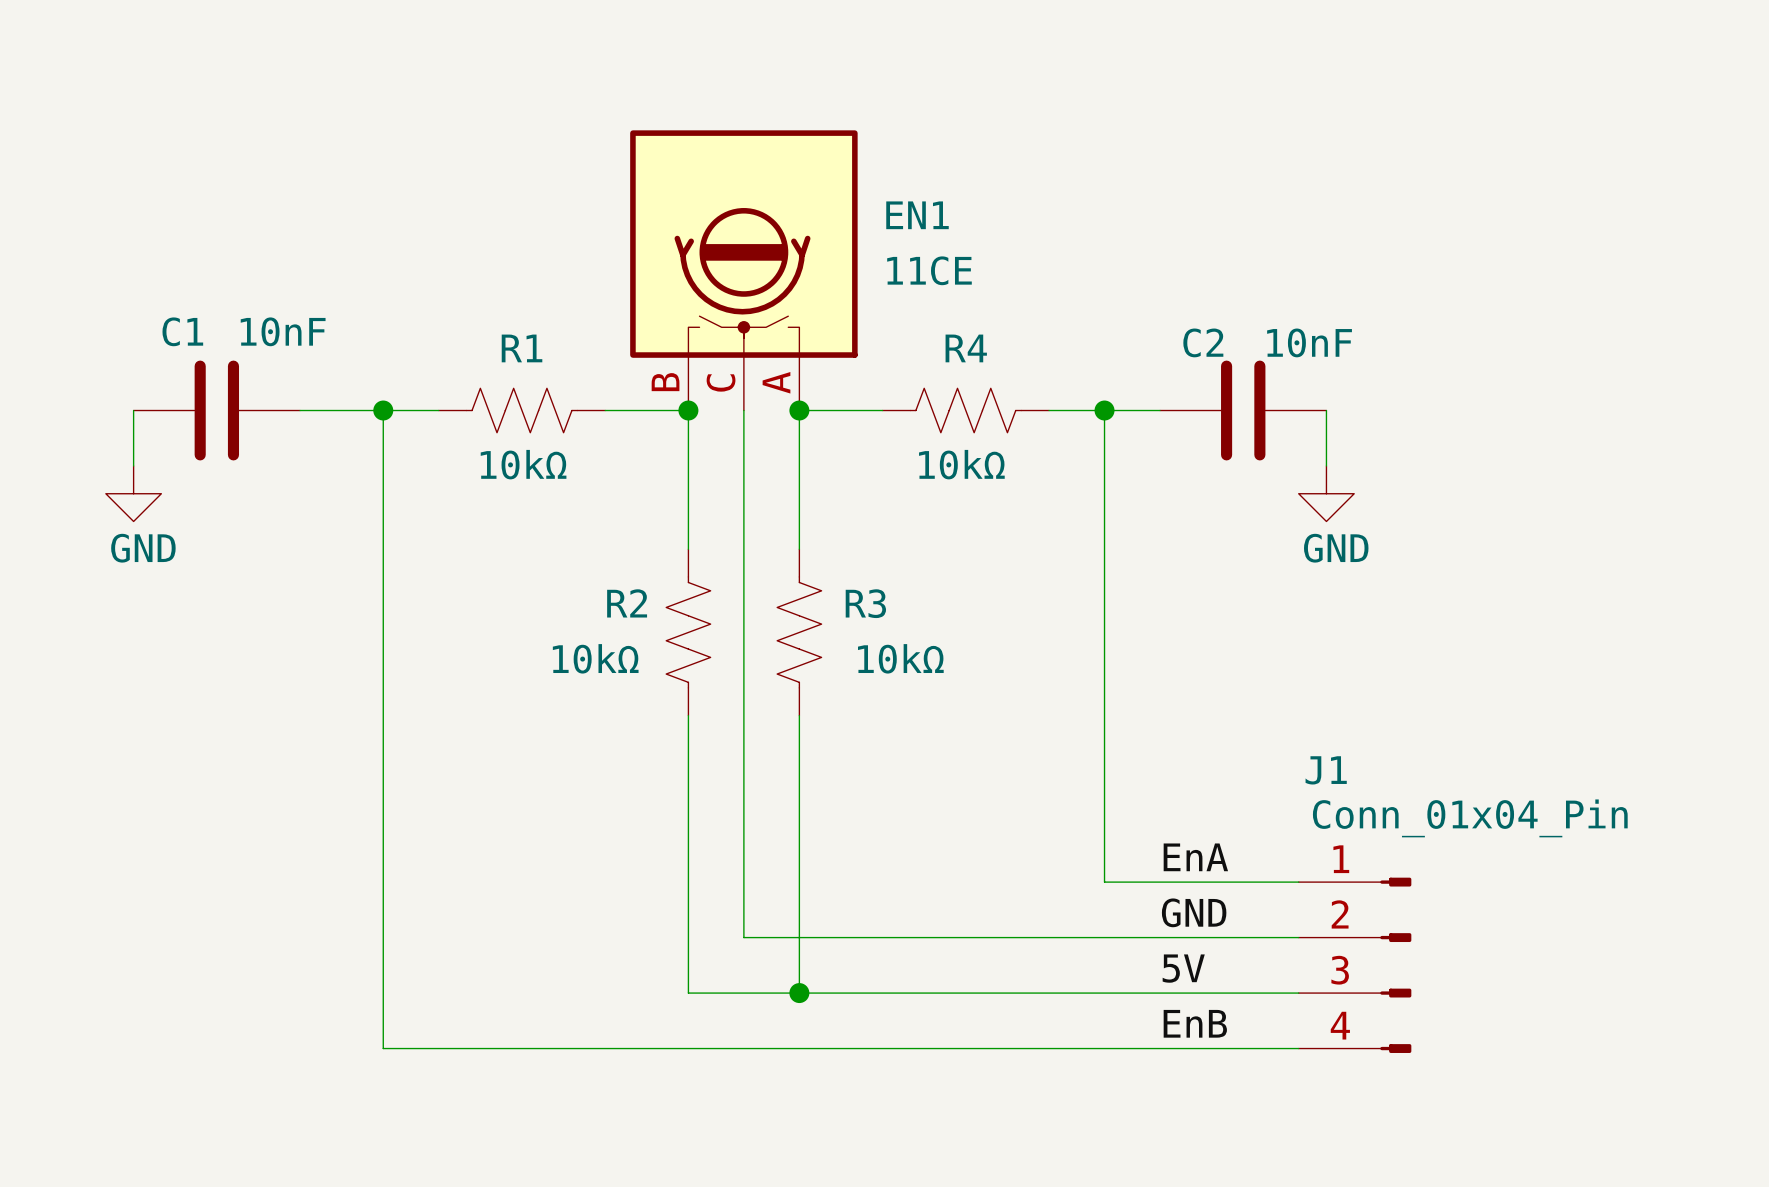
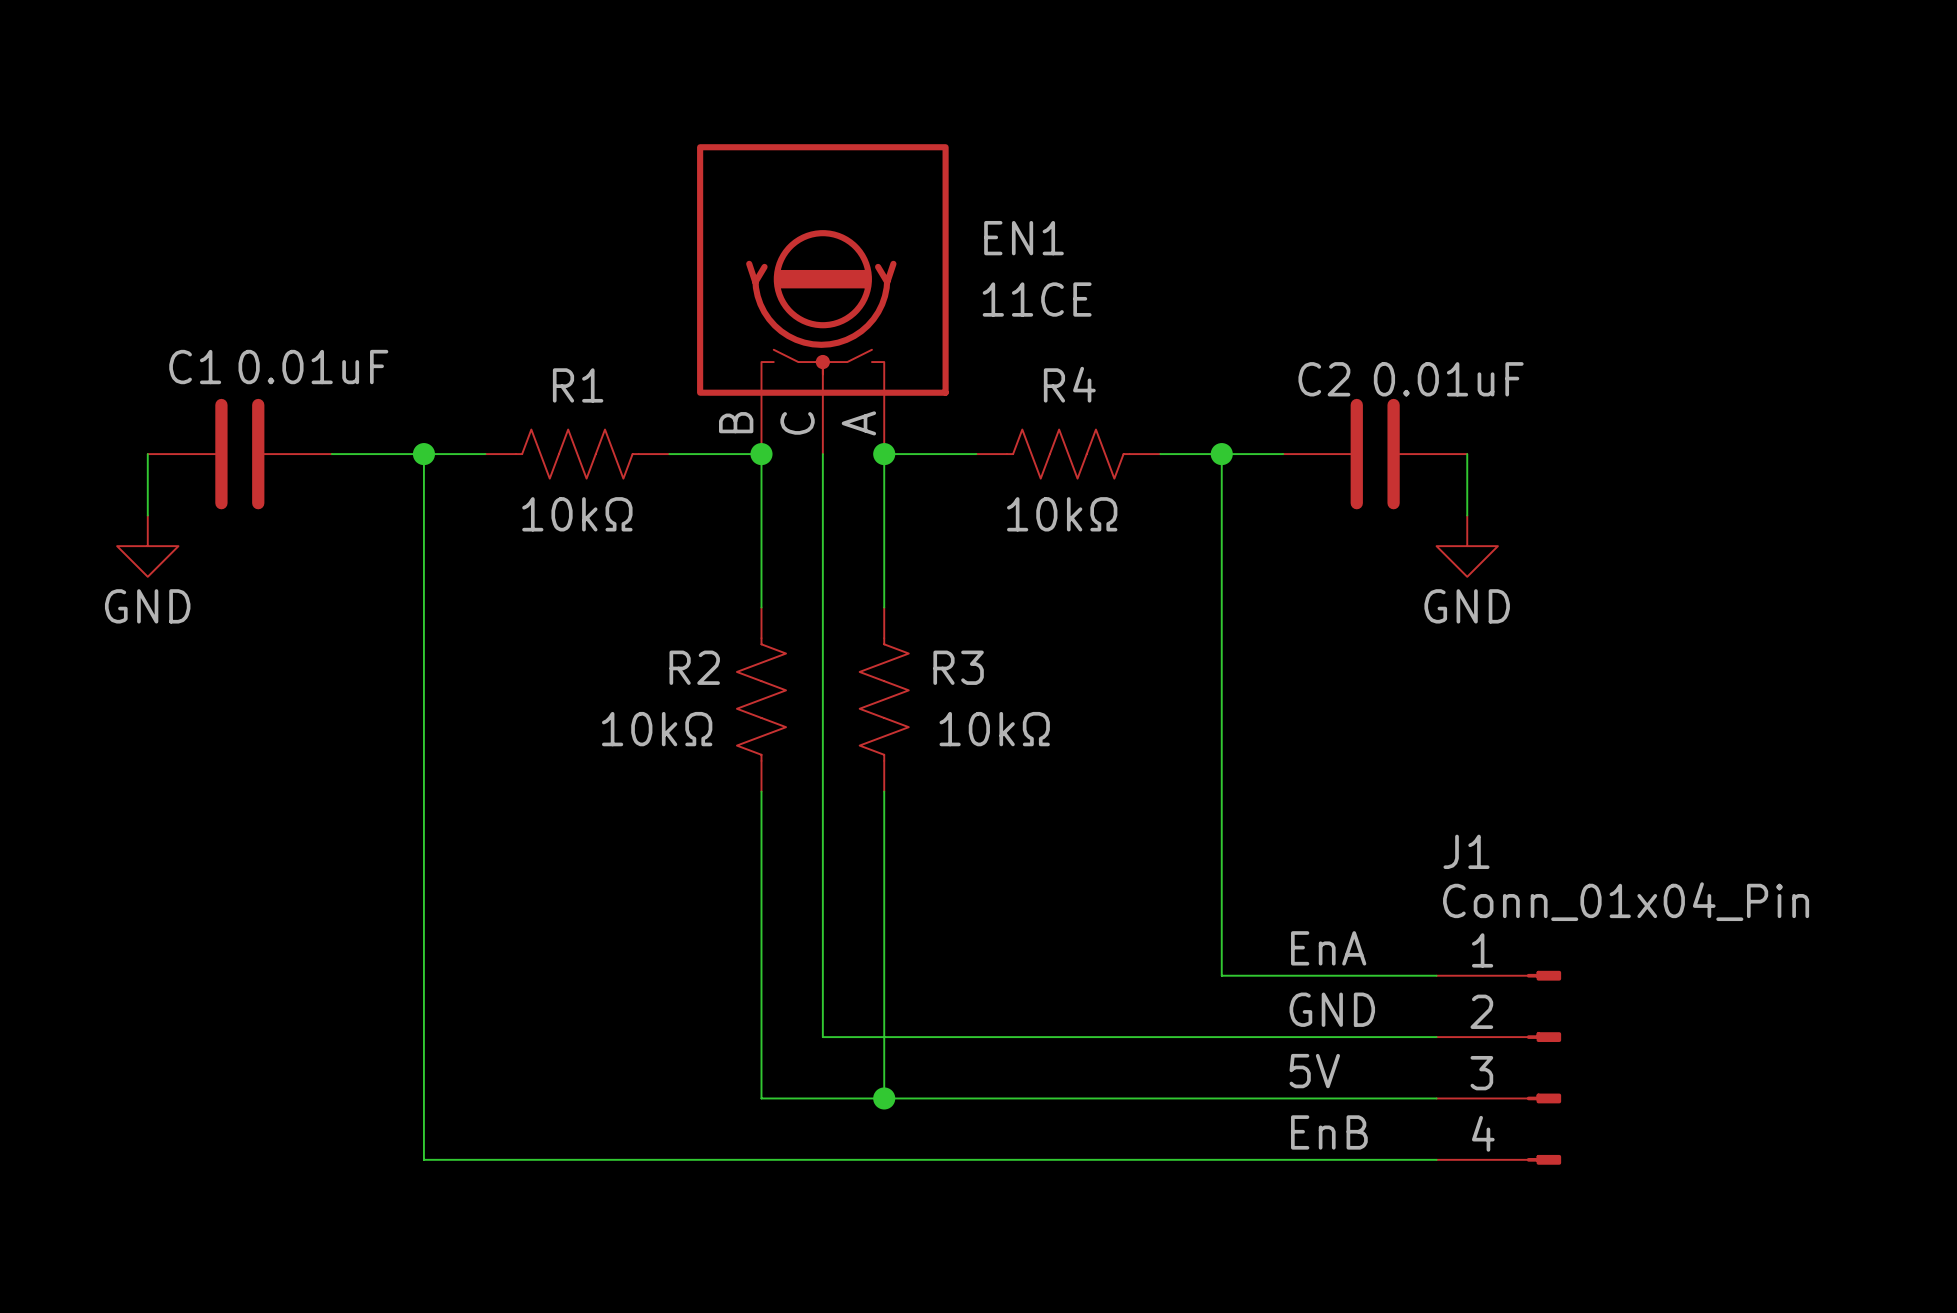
C1 value: 10nF (283, 331) -> 0.01uF (313, 367)
C2 value: 10nF (1309, 342) -> 0.01uF (1448, 379)

